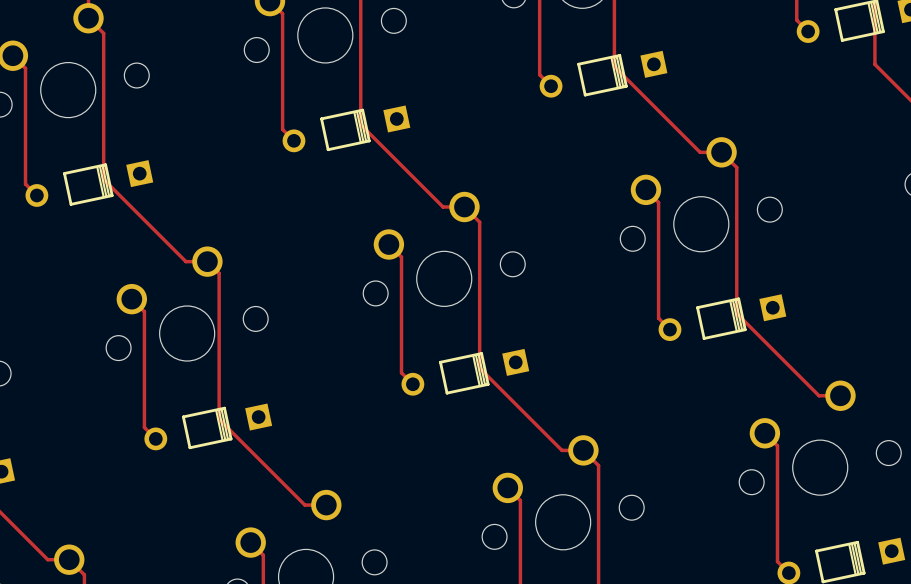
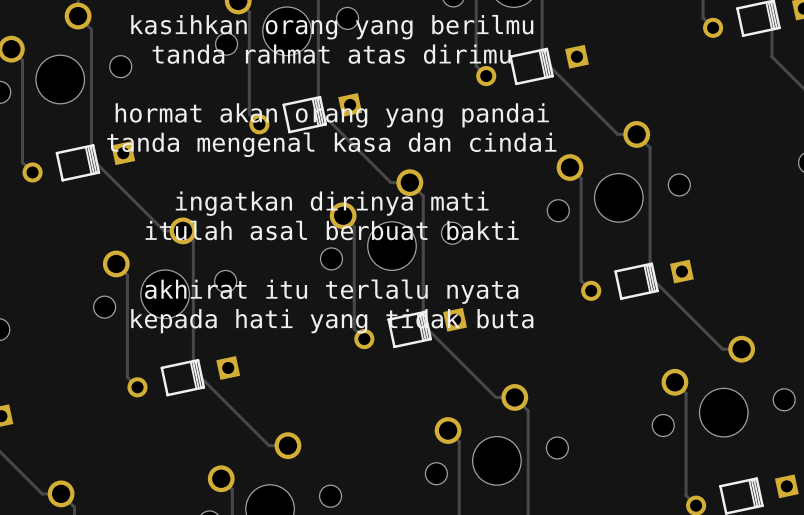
text: none -> kasihkan orang yang berilmu (332, 27)
text: none -> tanda rahmat atas dirimu (331, 54)
text: none -> hormat akan orang yang pandai (332, 115)
text: none -> tanda mengenal kasa dan cindai (331, 144)
text: none -> ingatkan dirinya mati (332, 203)
text: none -> itulah asal berbuat bakti (332, 230)
text: none -> akhirat itu terlalu nyata (331, 291)
text: none -> kepada hati yang tidak buta (332, 321)

